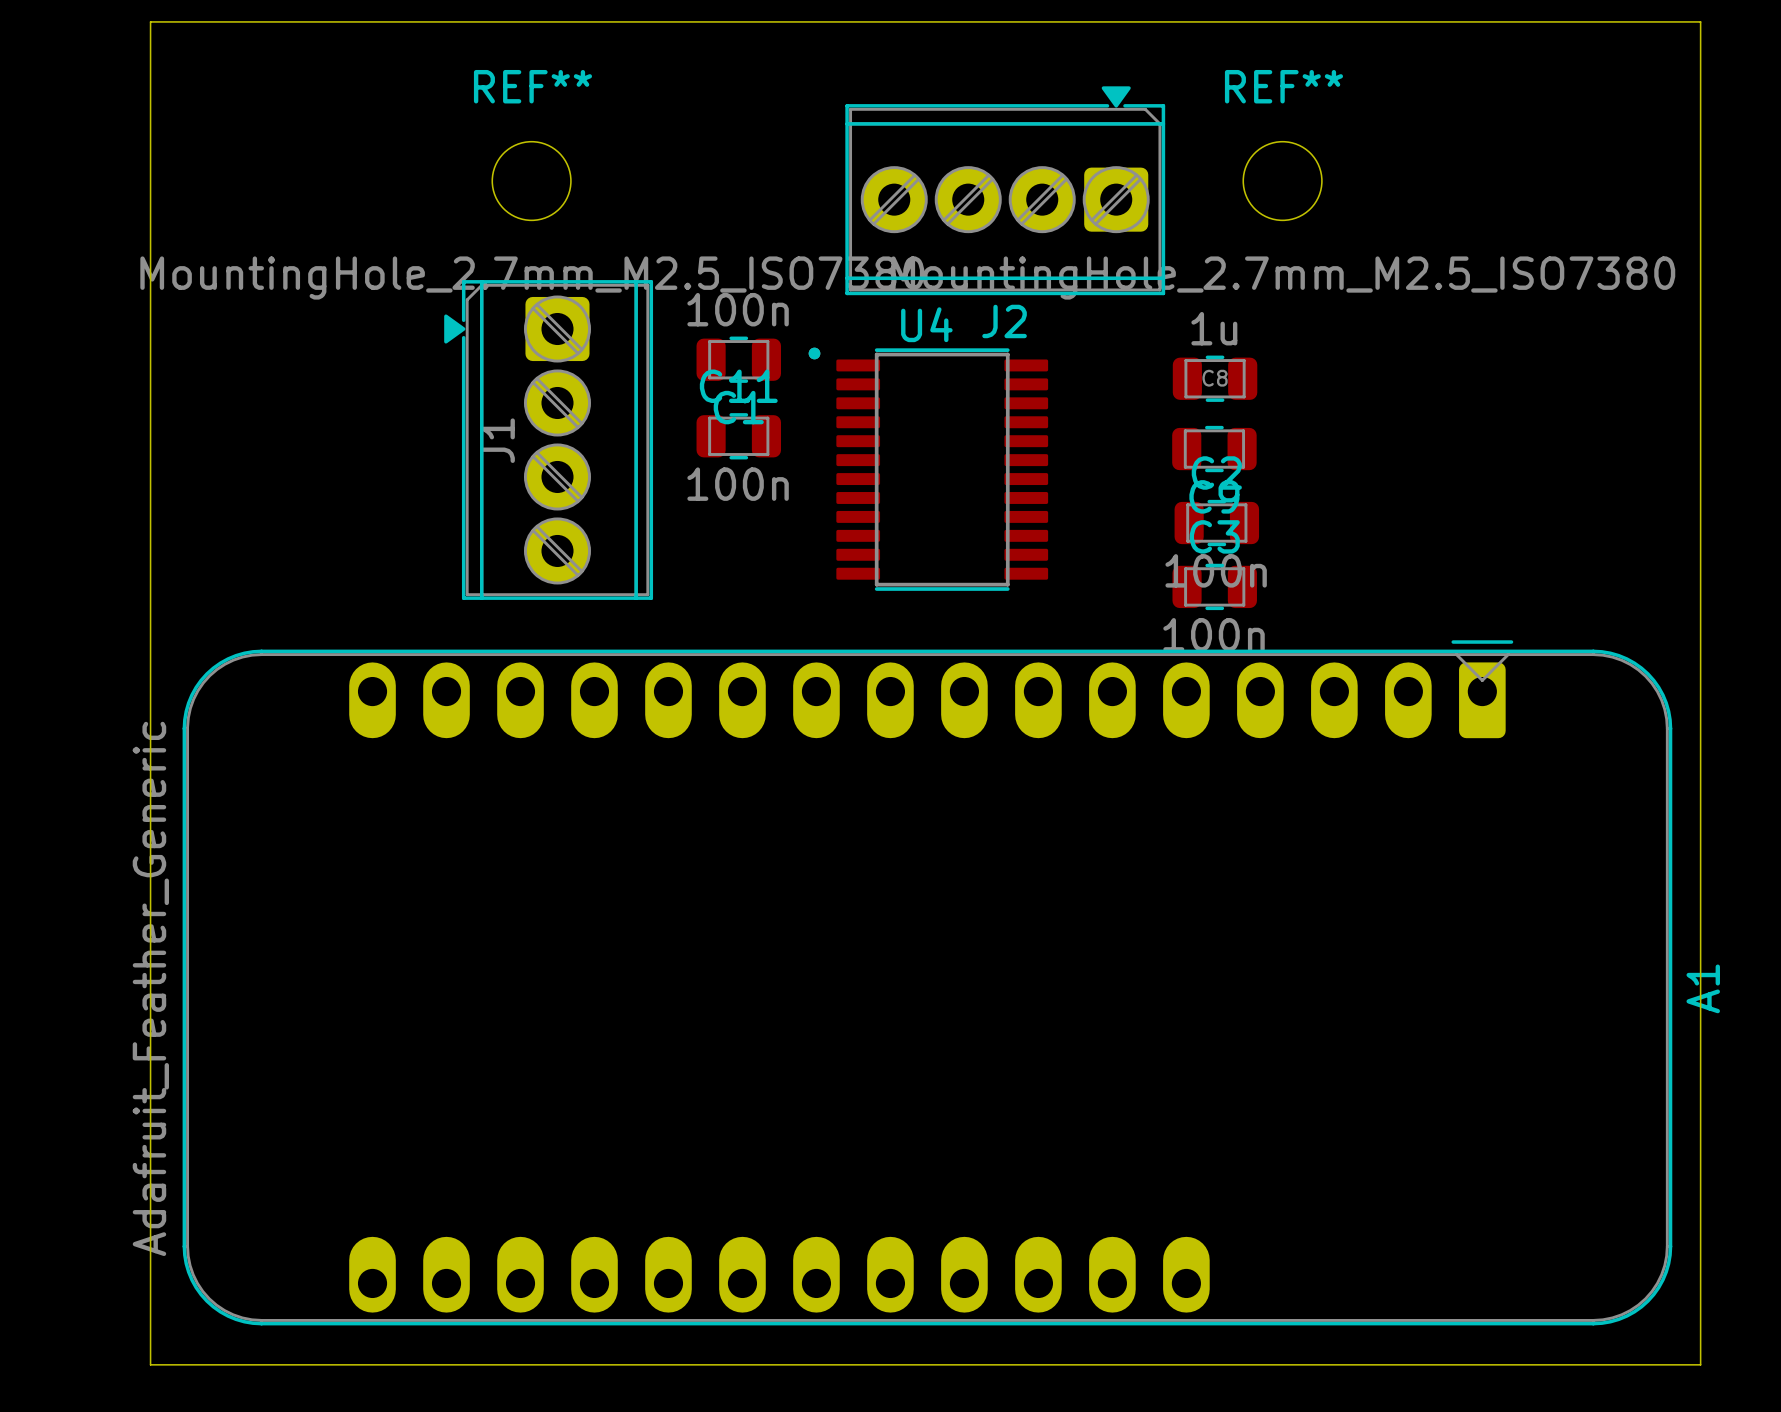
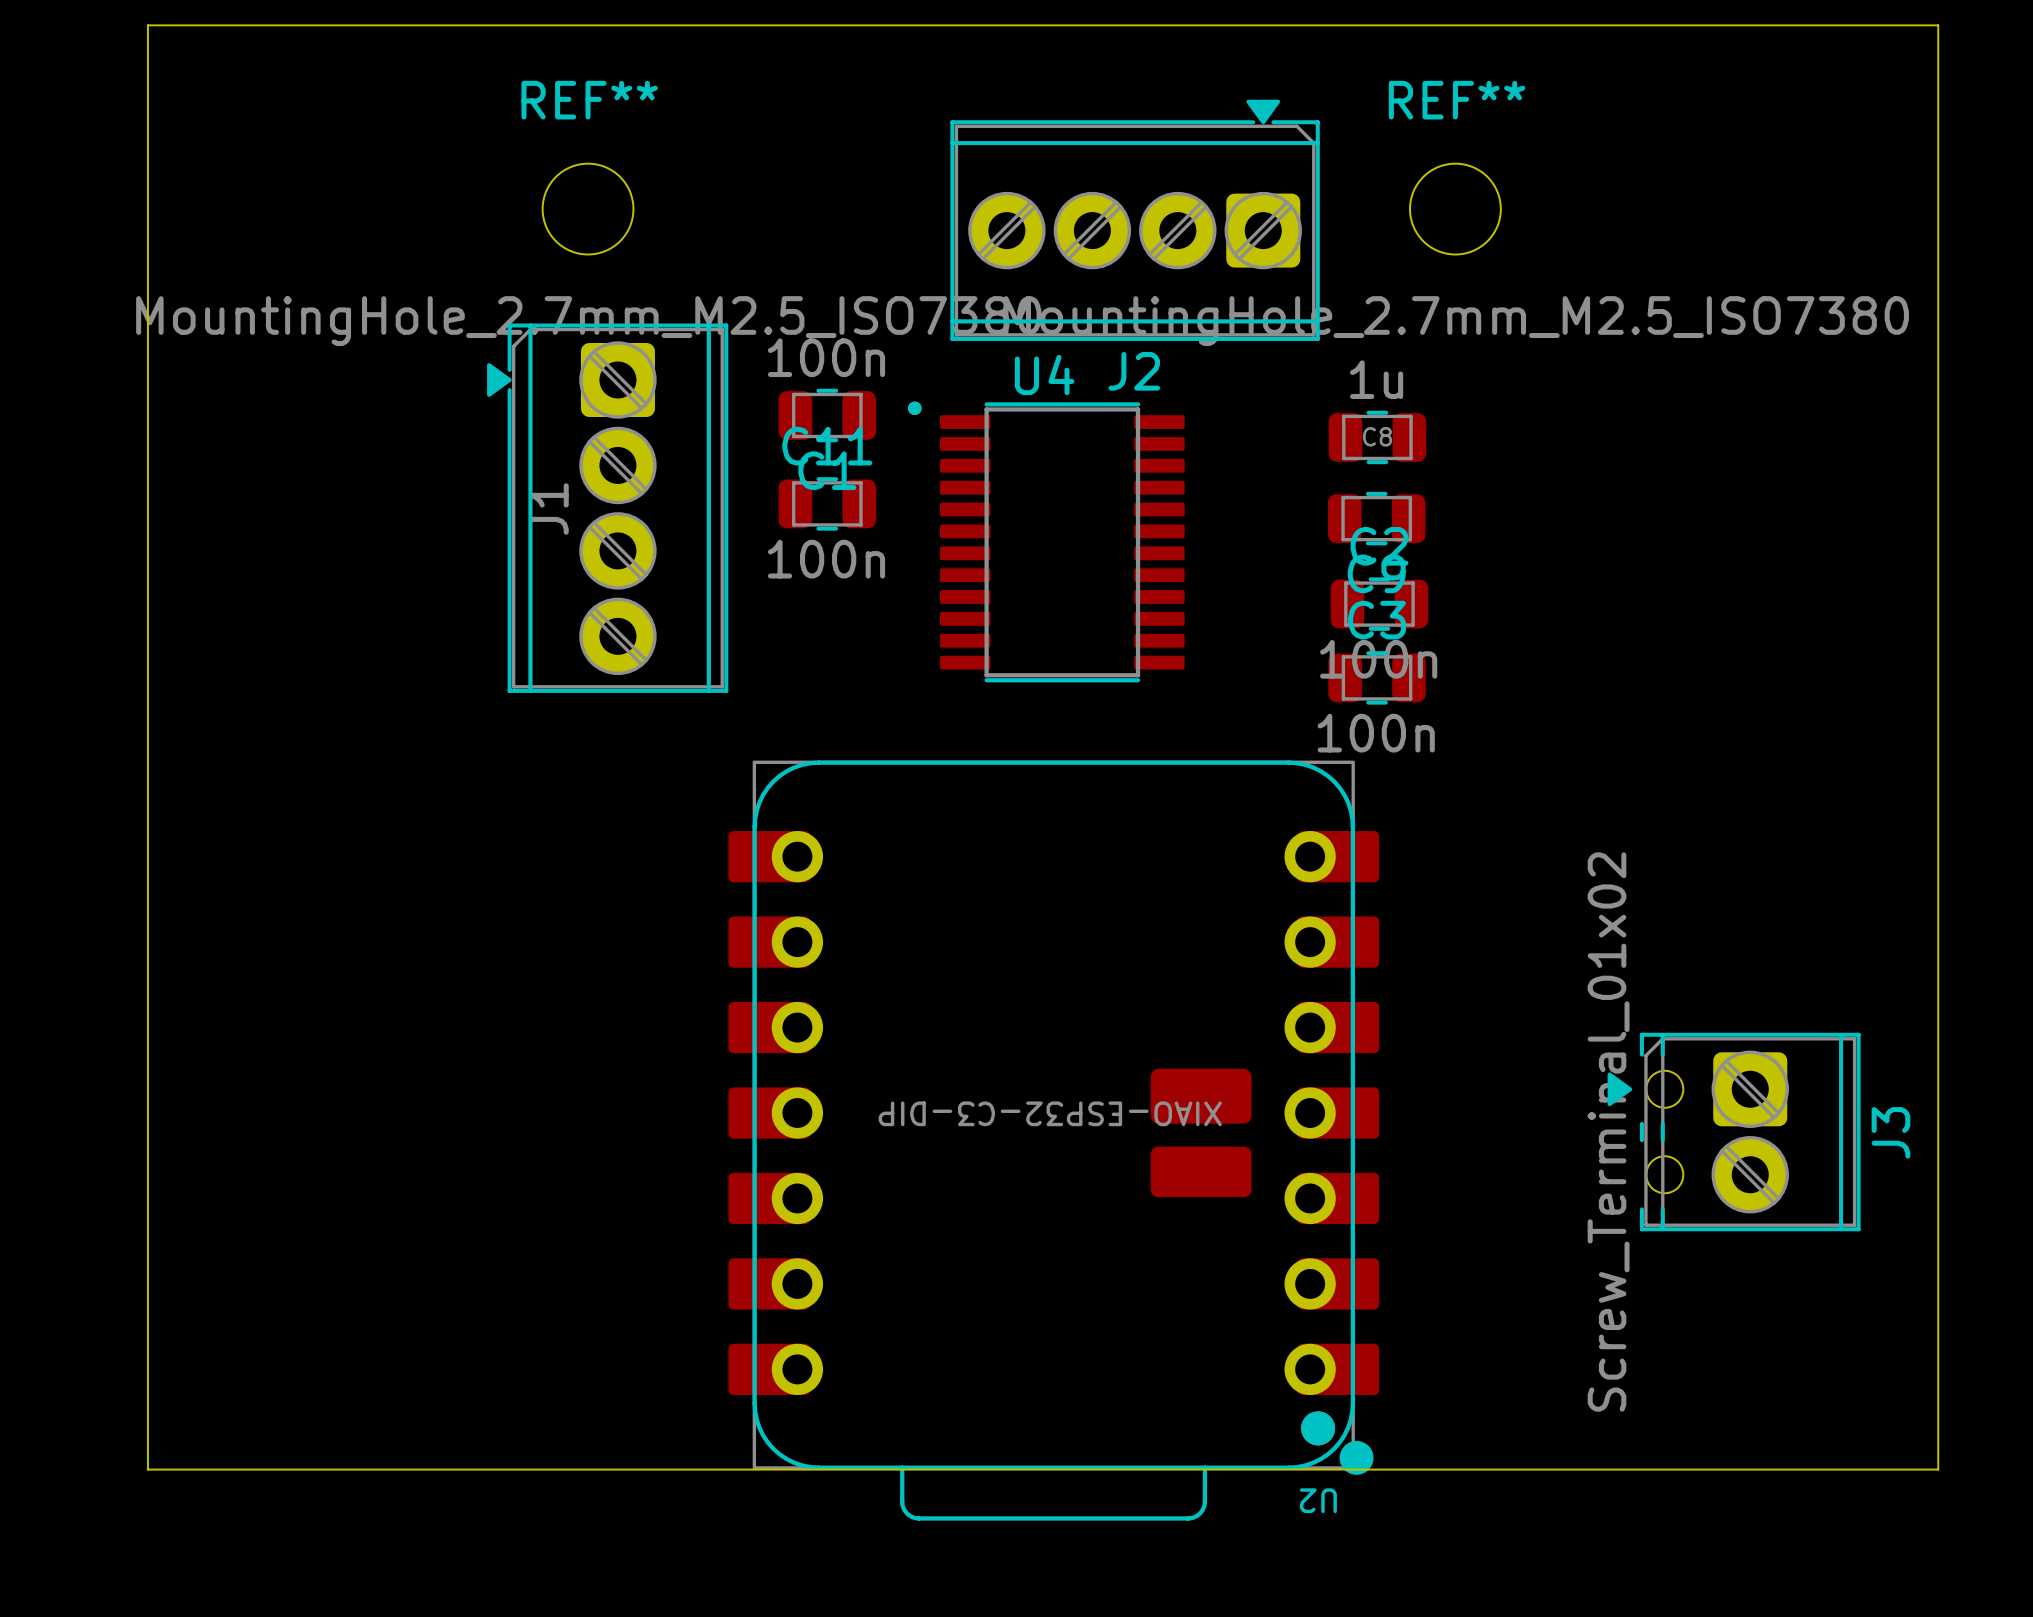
J3: none -> Screw_Terminal_01x02 (1734, 1132)
A1: Adafruit_Feather_Generic (927, 982) -> none
U2: none -> XIAO-ESP32-C3-DIP (1053, 1140)
board edge: (150, 1272) (150, 1364) (1700, 1364) (1700, 1272) -> (147, 1469) (1938, 1469)

